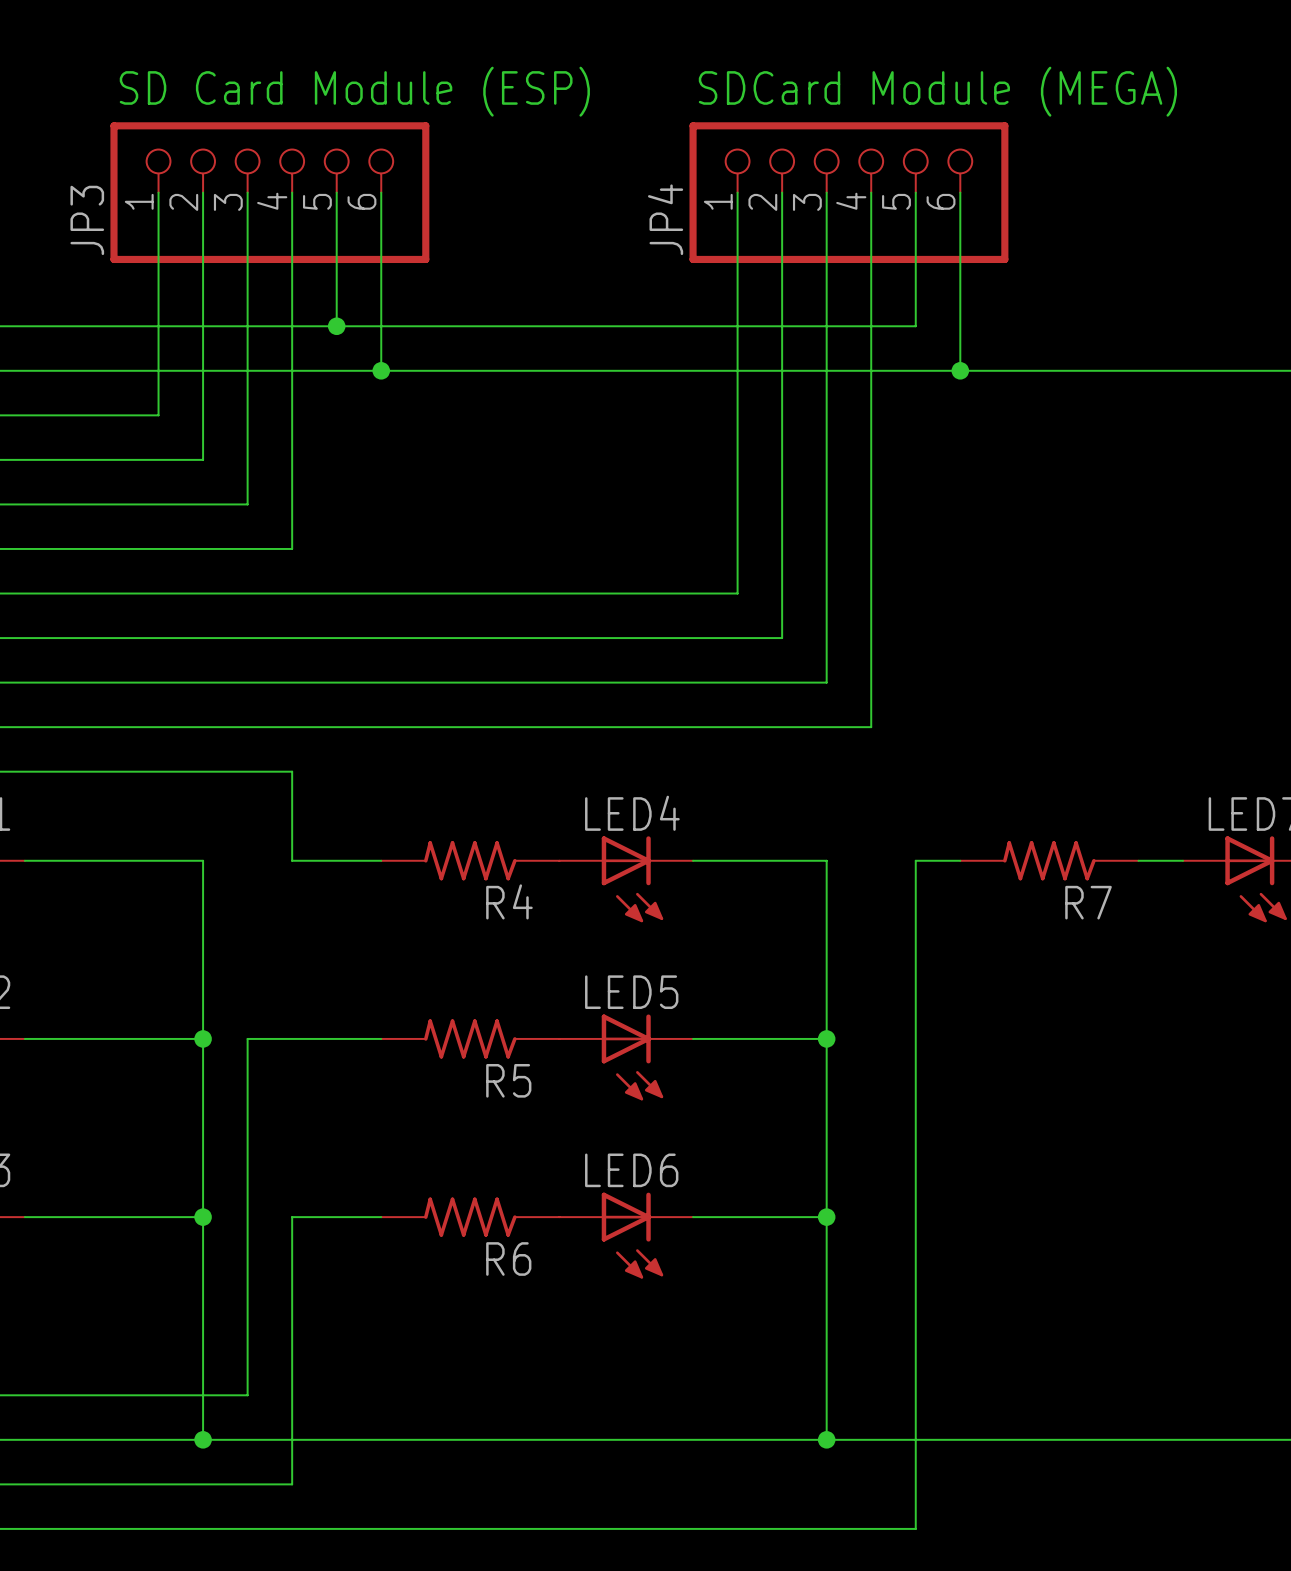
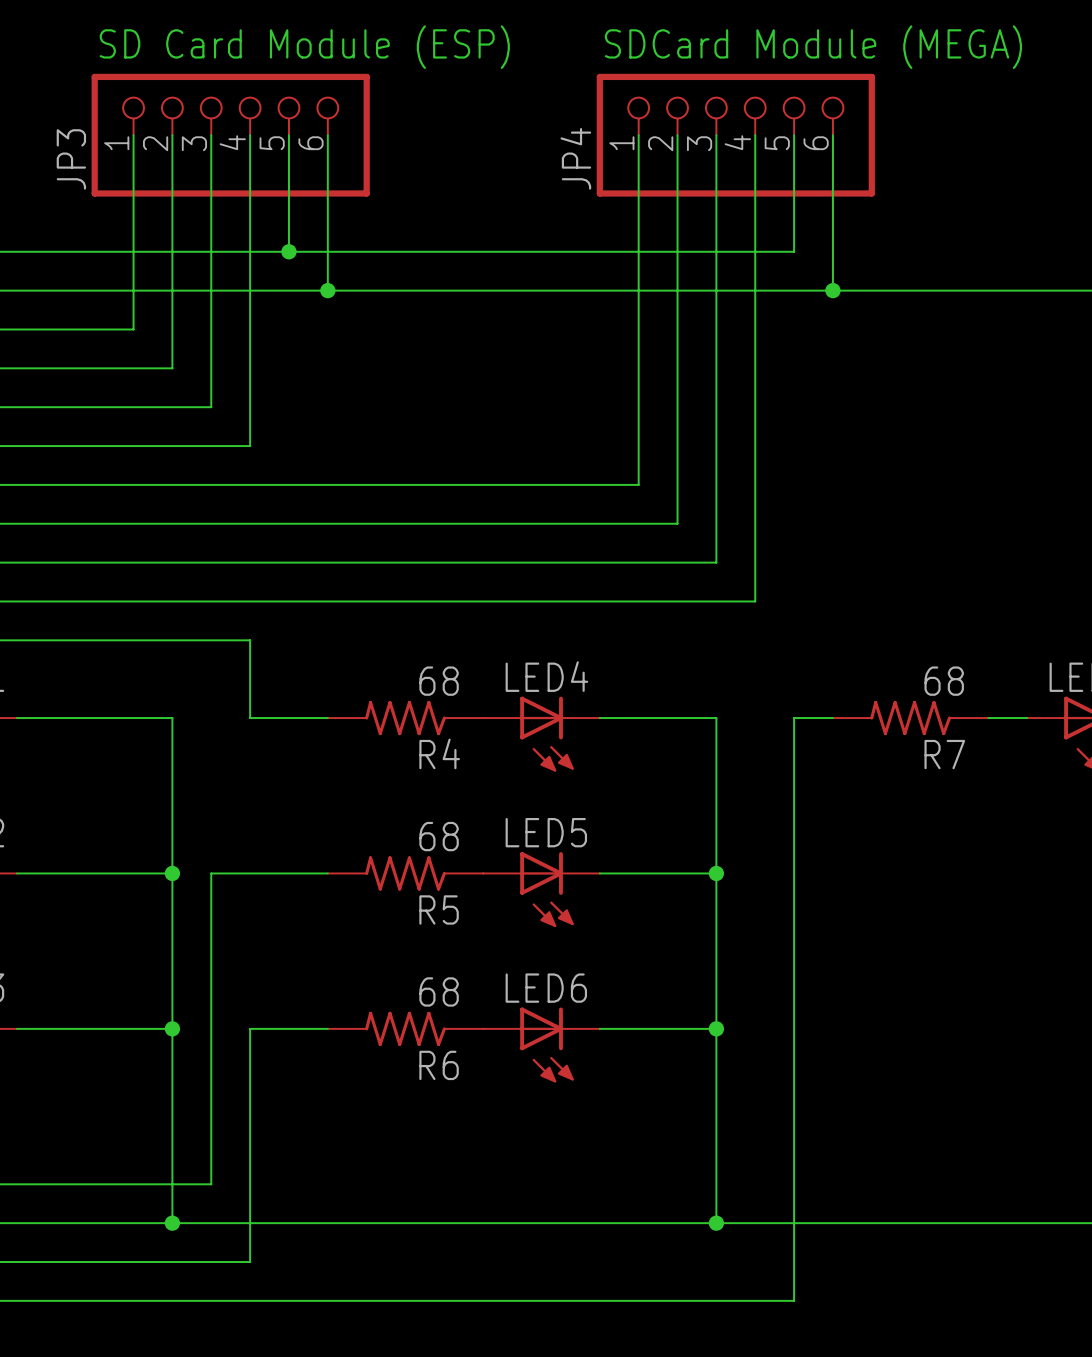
R4 value: none -> 68 (439, 681)
R7 value: none -> 68 (944, 681)
R5 value: none -> 68 (439, 836)
R6 value: none -> 68 (439, 991)

